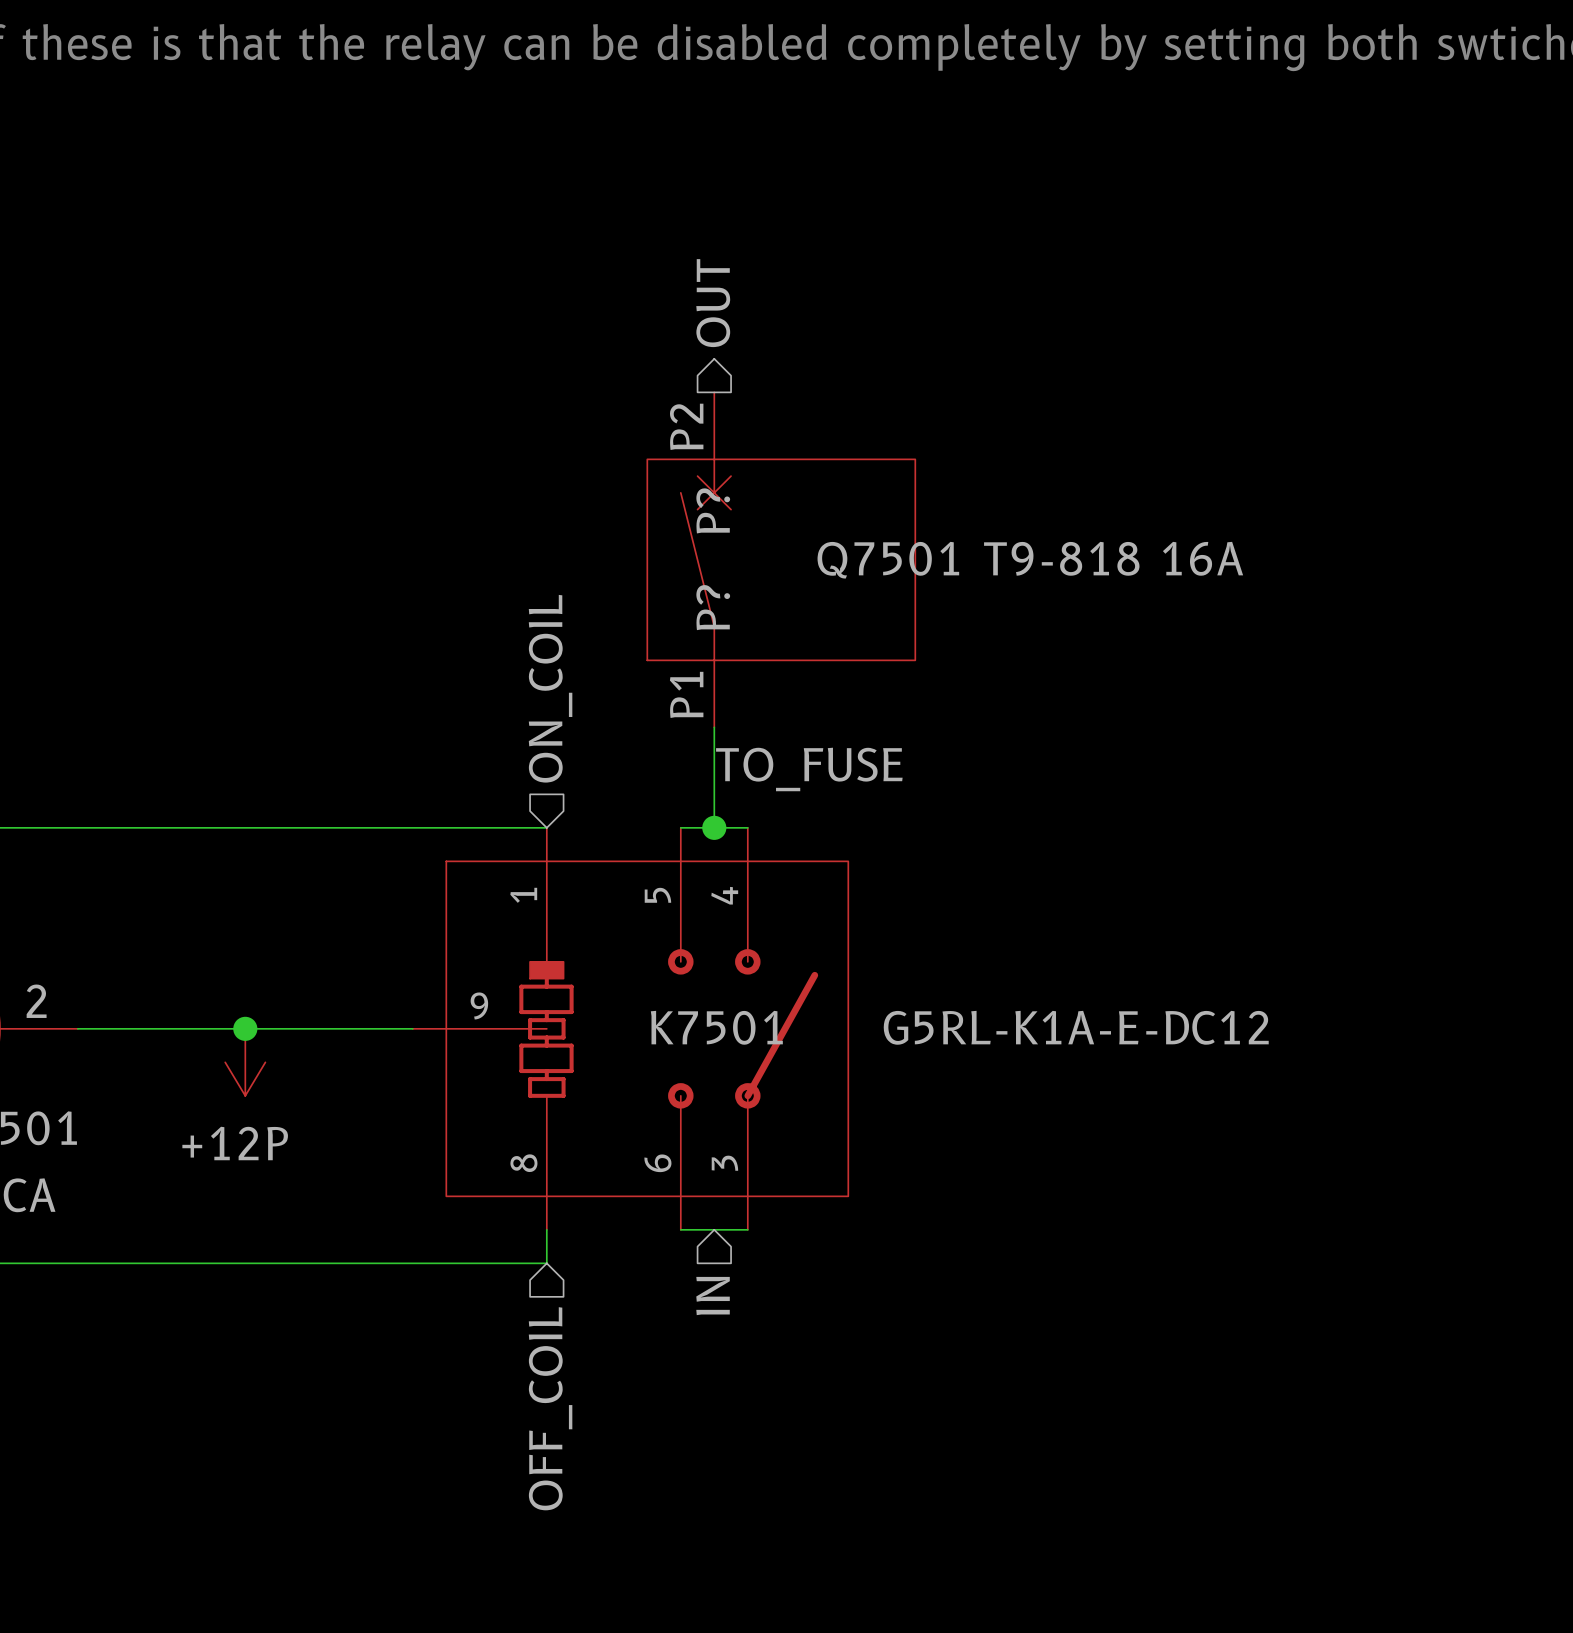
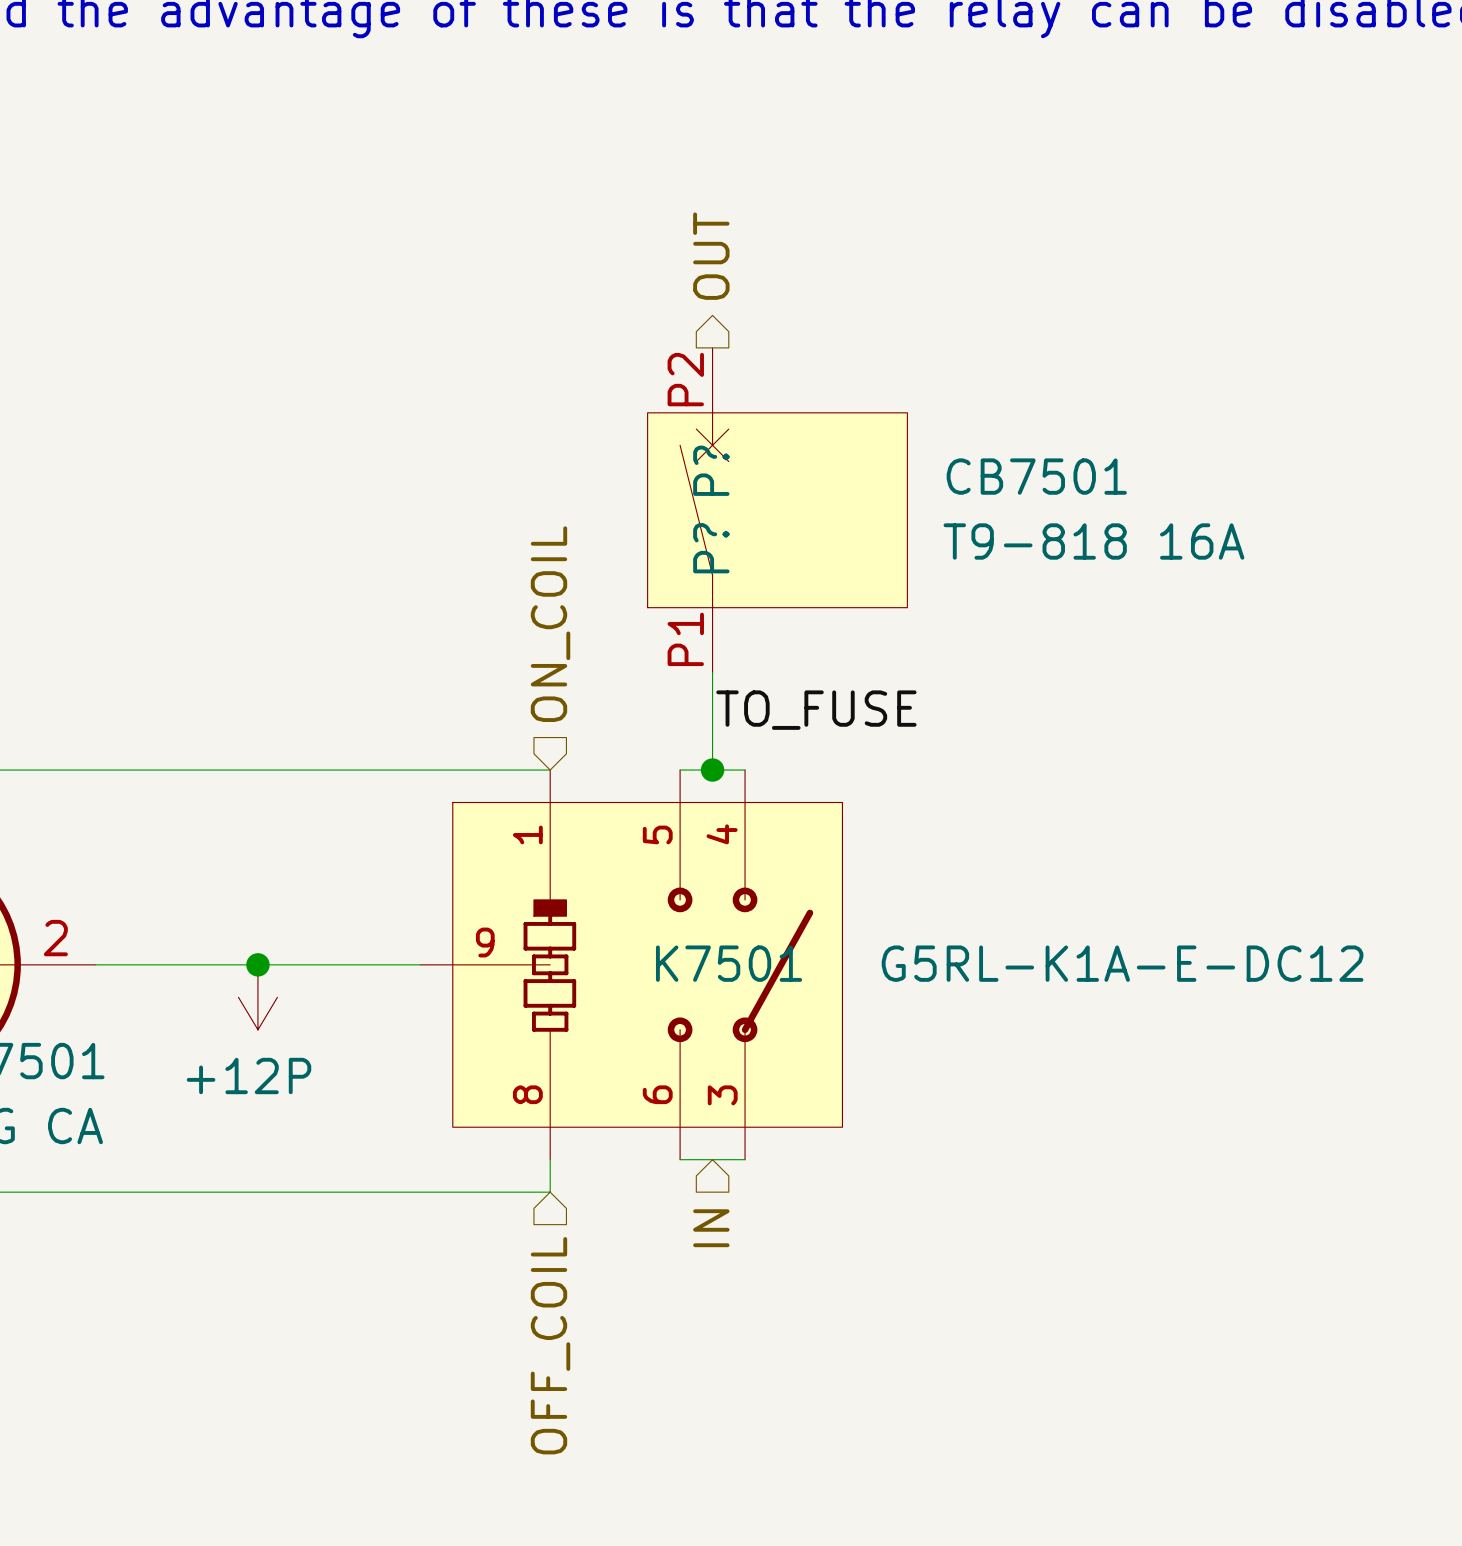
Q7501 value position: T9-818 16A (1113, 558) -> T9-818 16A (1093, 541)
Q7501 name: Q7501 (888, 560) -> CB7501 (1036, 476)

